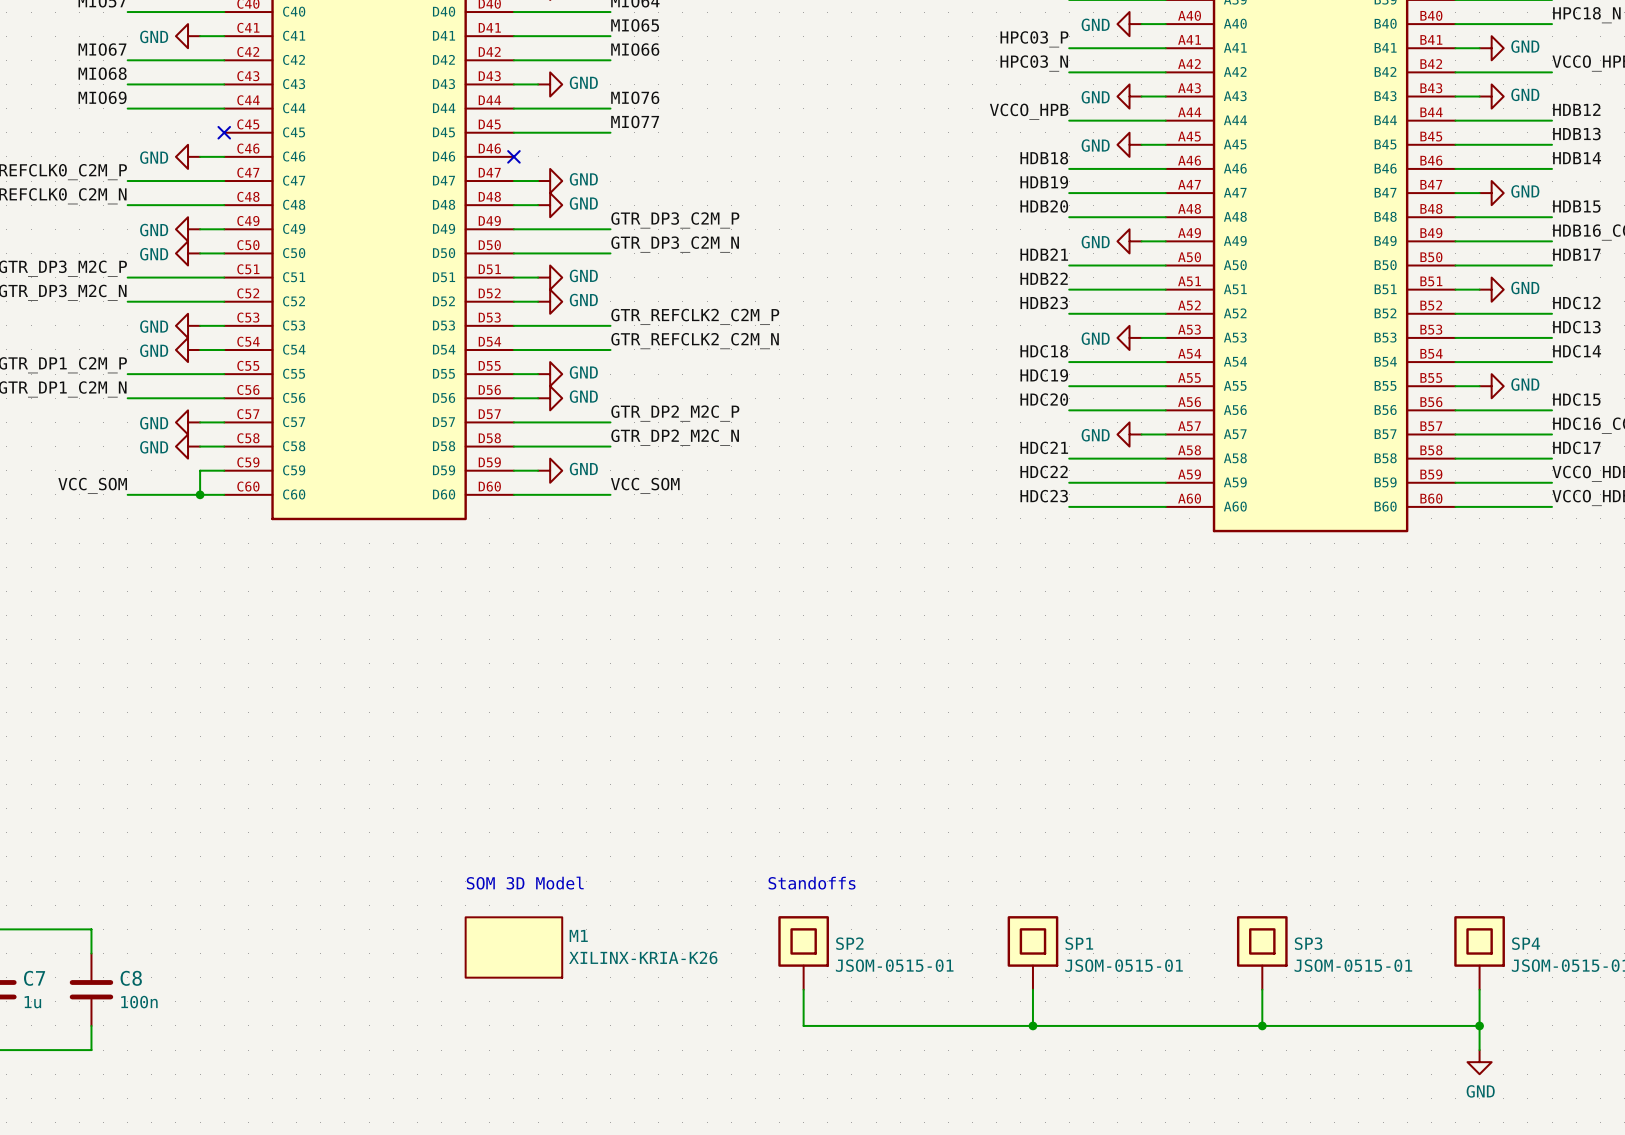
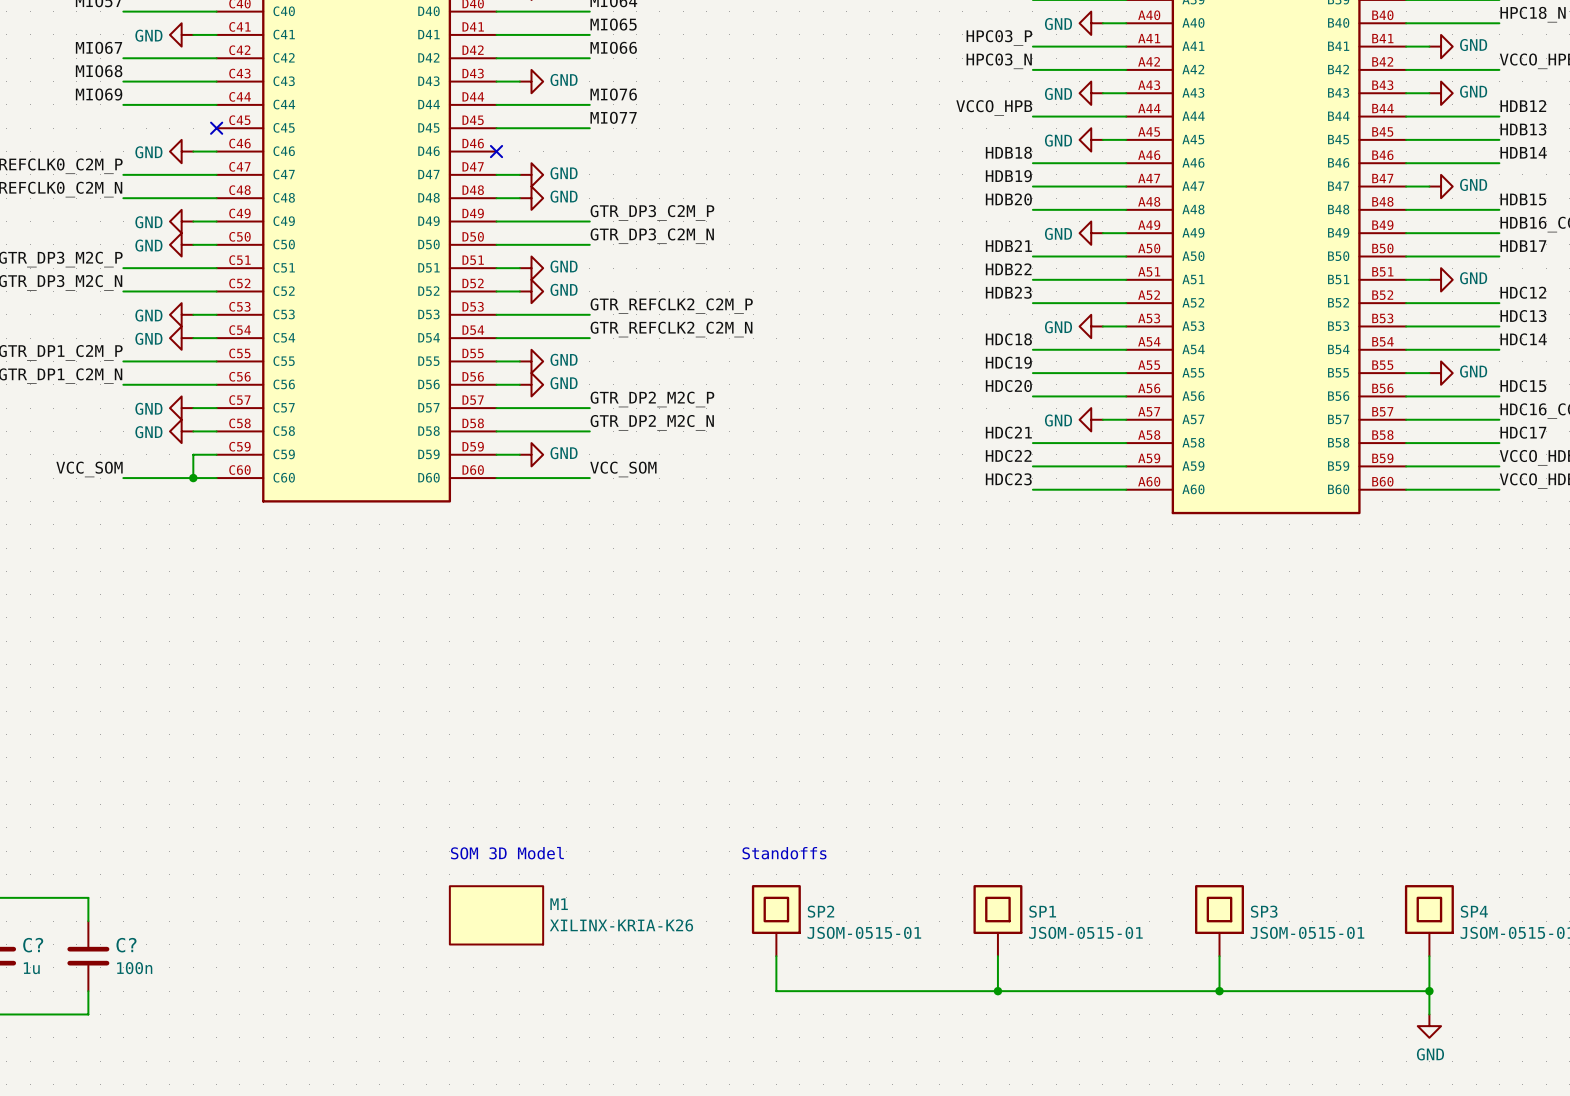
C7 name: C7 (34, 978) -> C? (33, 945)
C8 name: C8 (131, 978) -> C? (126, 945)

